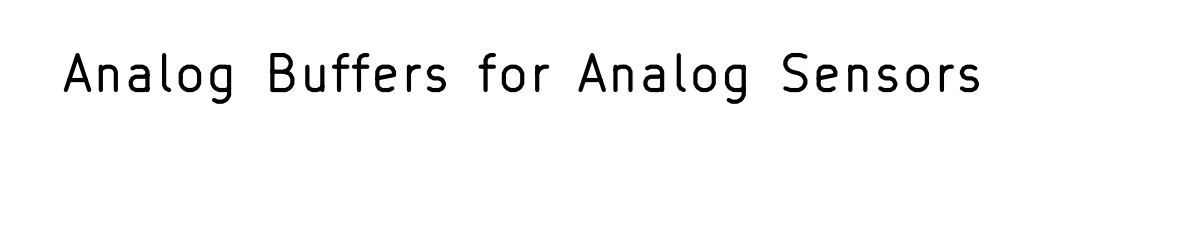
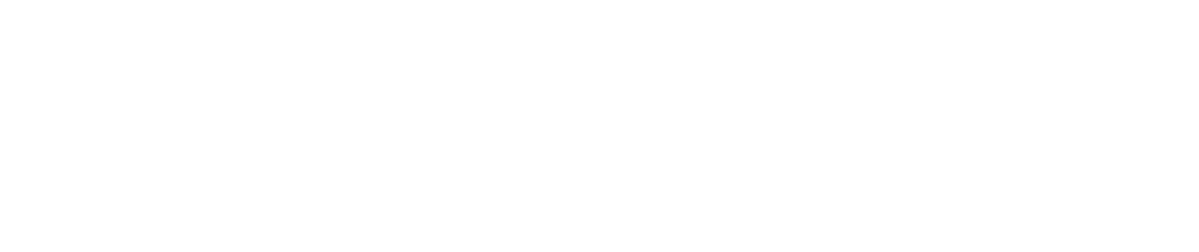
text: Analog Buffers for Analog Sensors (521, 78) -> none

